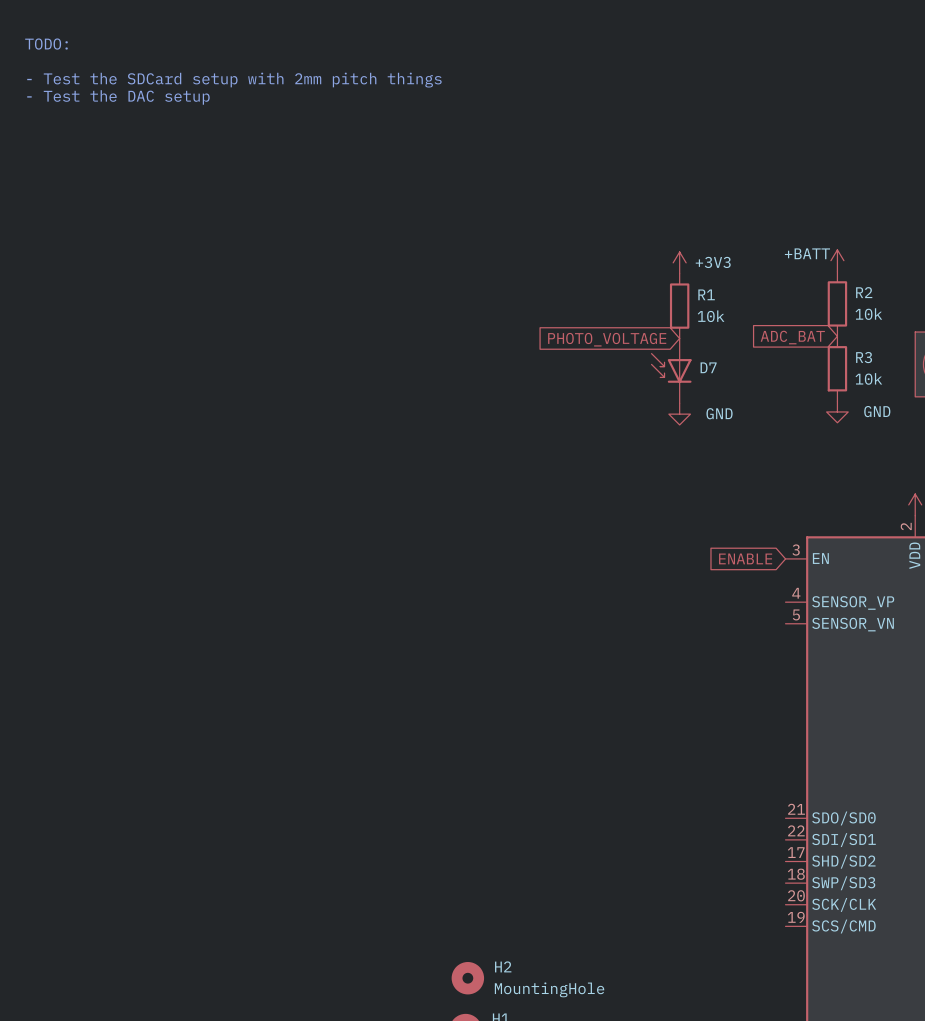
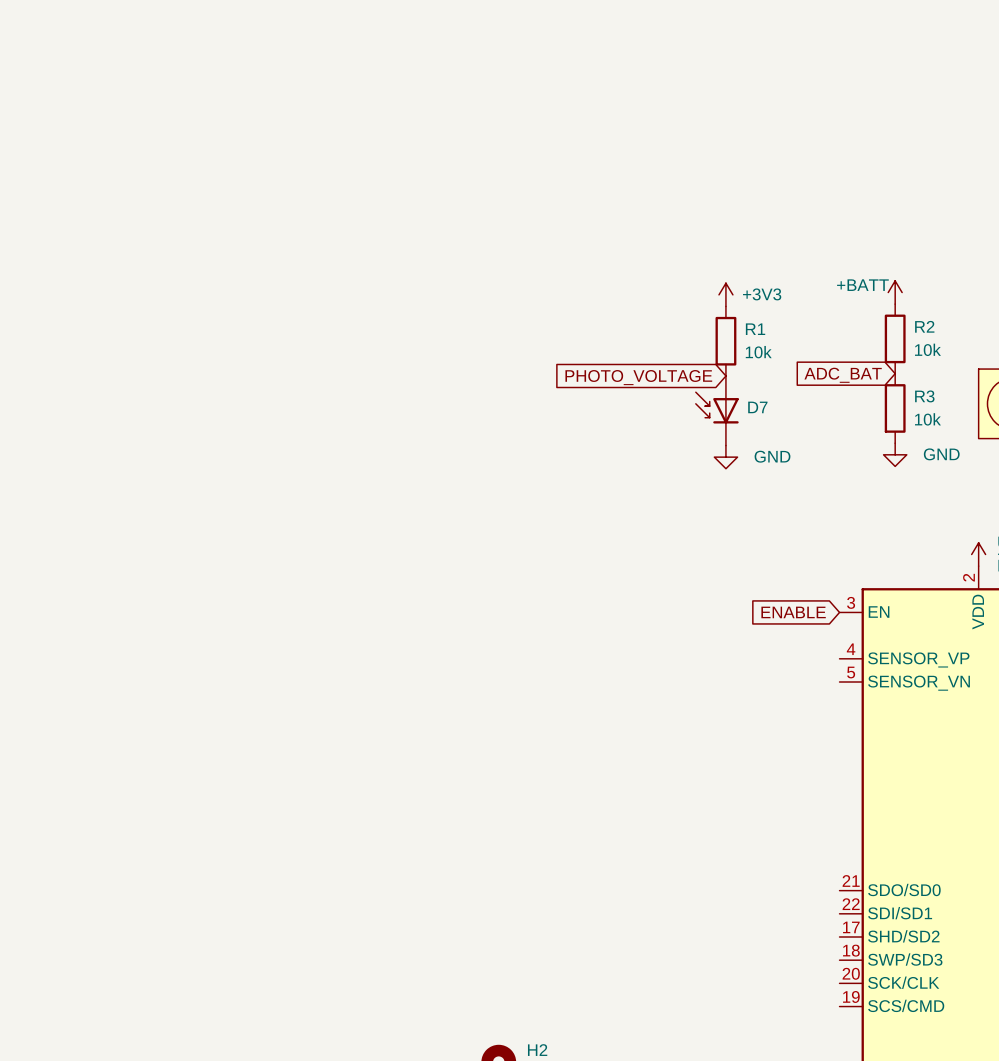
text: TODO: (46, 44) -> none
text: - Test the SDCard setup with 2mm pitch things (234, 80) -> none
text: - Test the DAC setup (118, 97) -> none

